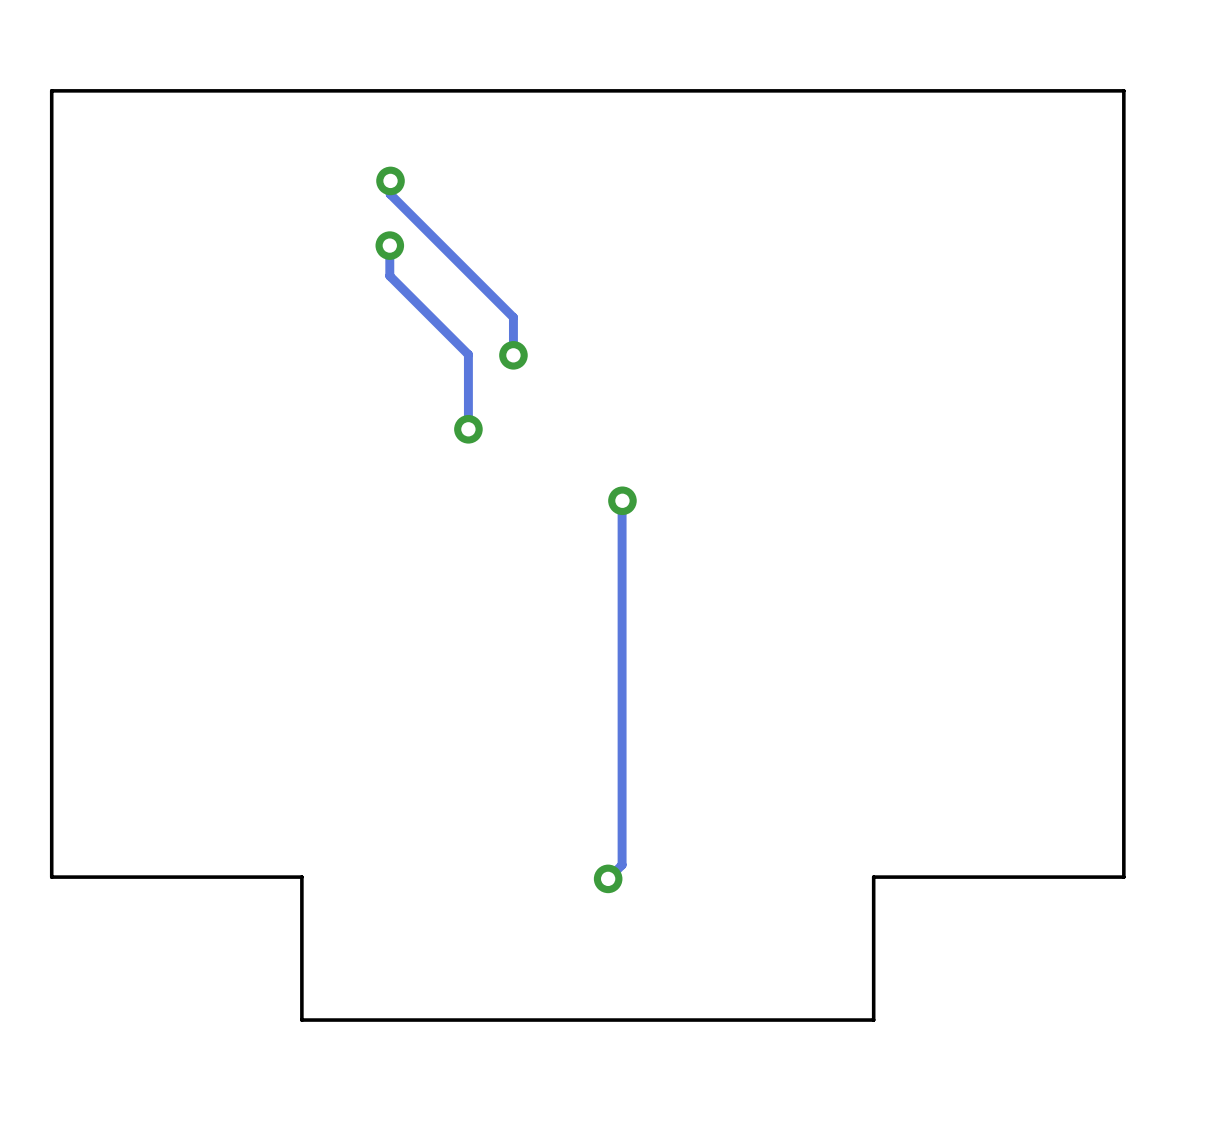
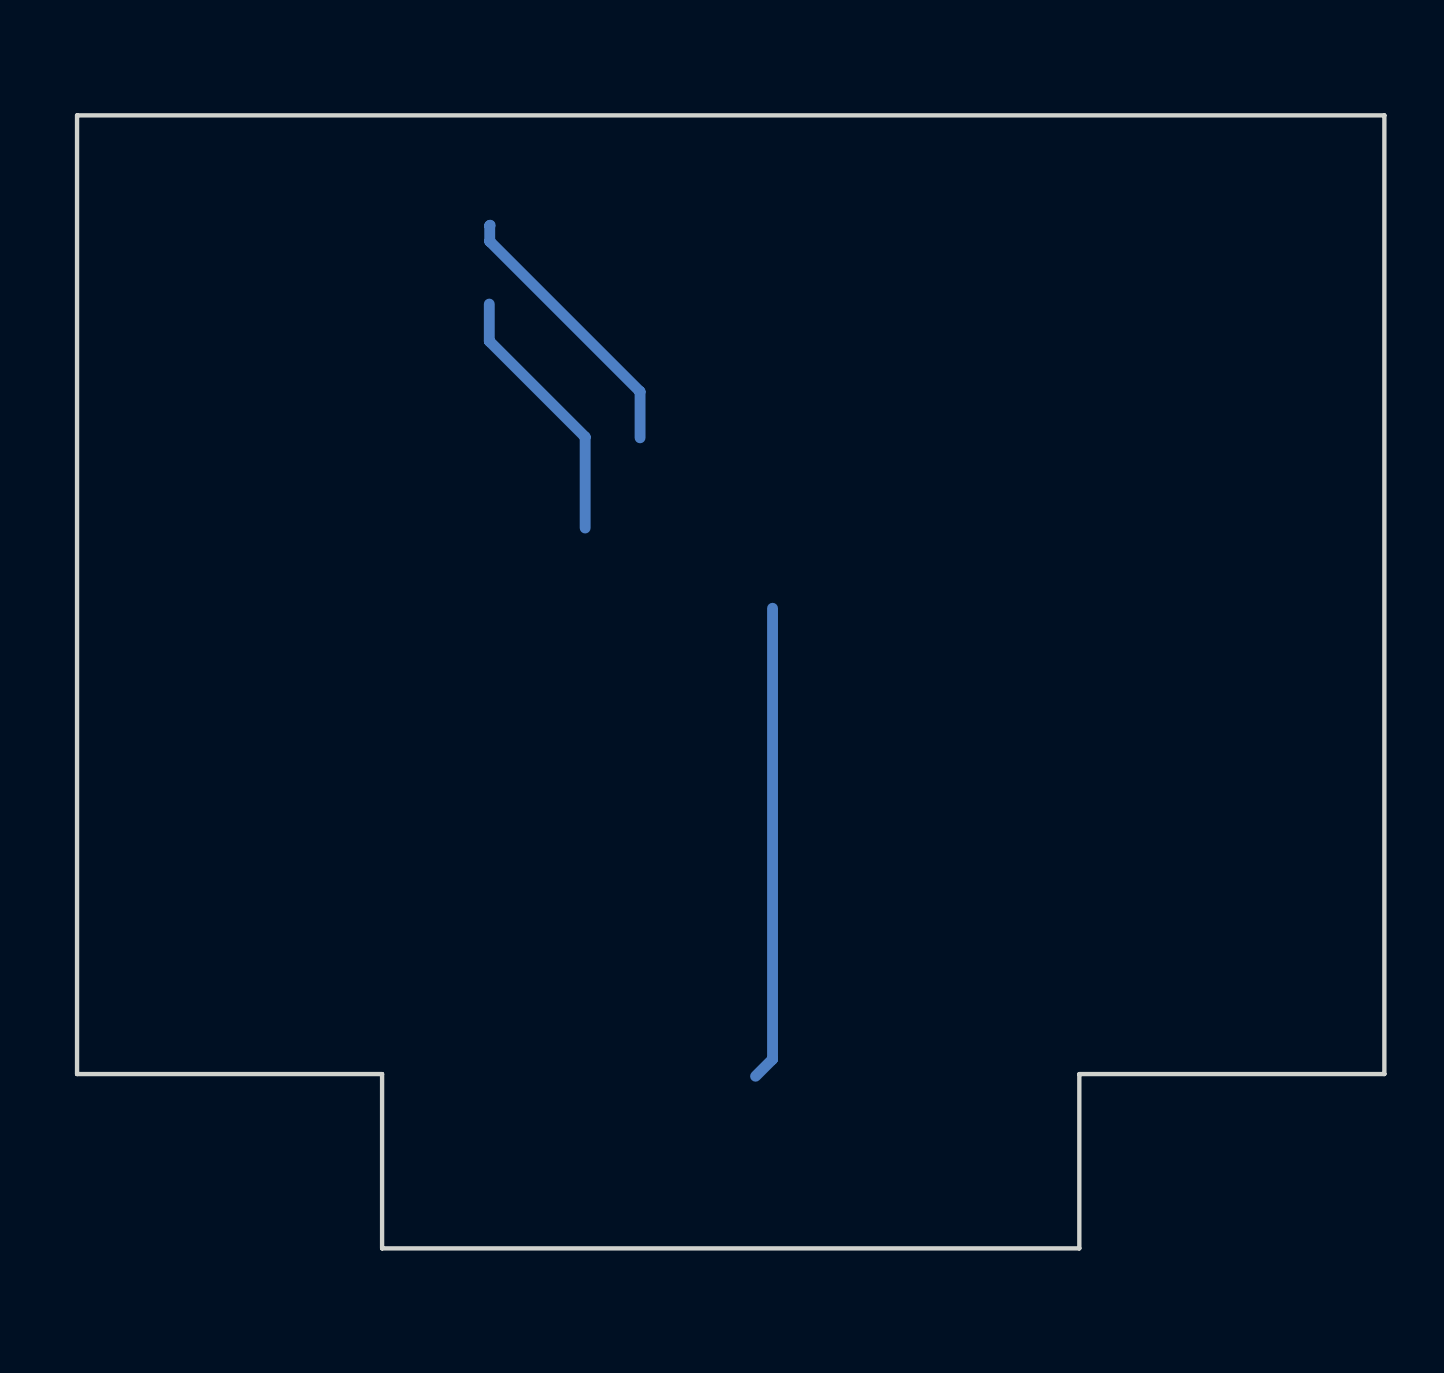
via: (390, 180) -> none
via: (389, 245) -> none
via: (513, 355) -> none
via: (468, 429) -> none
via: (622, 500) -> none
via: (608, 878) -> none

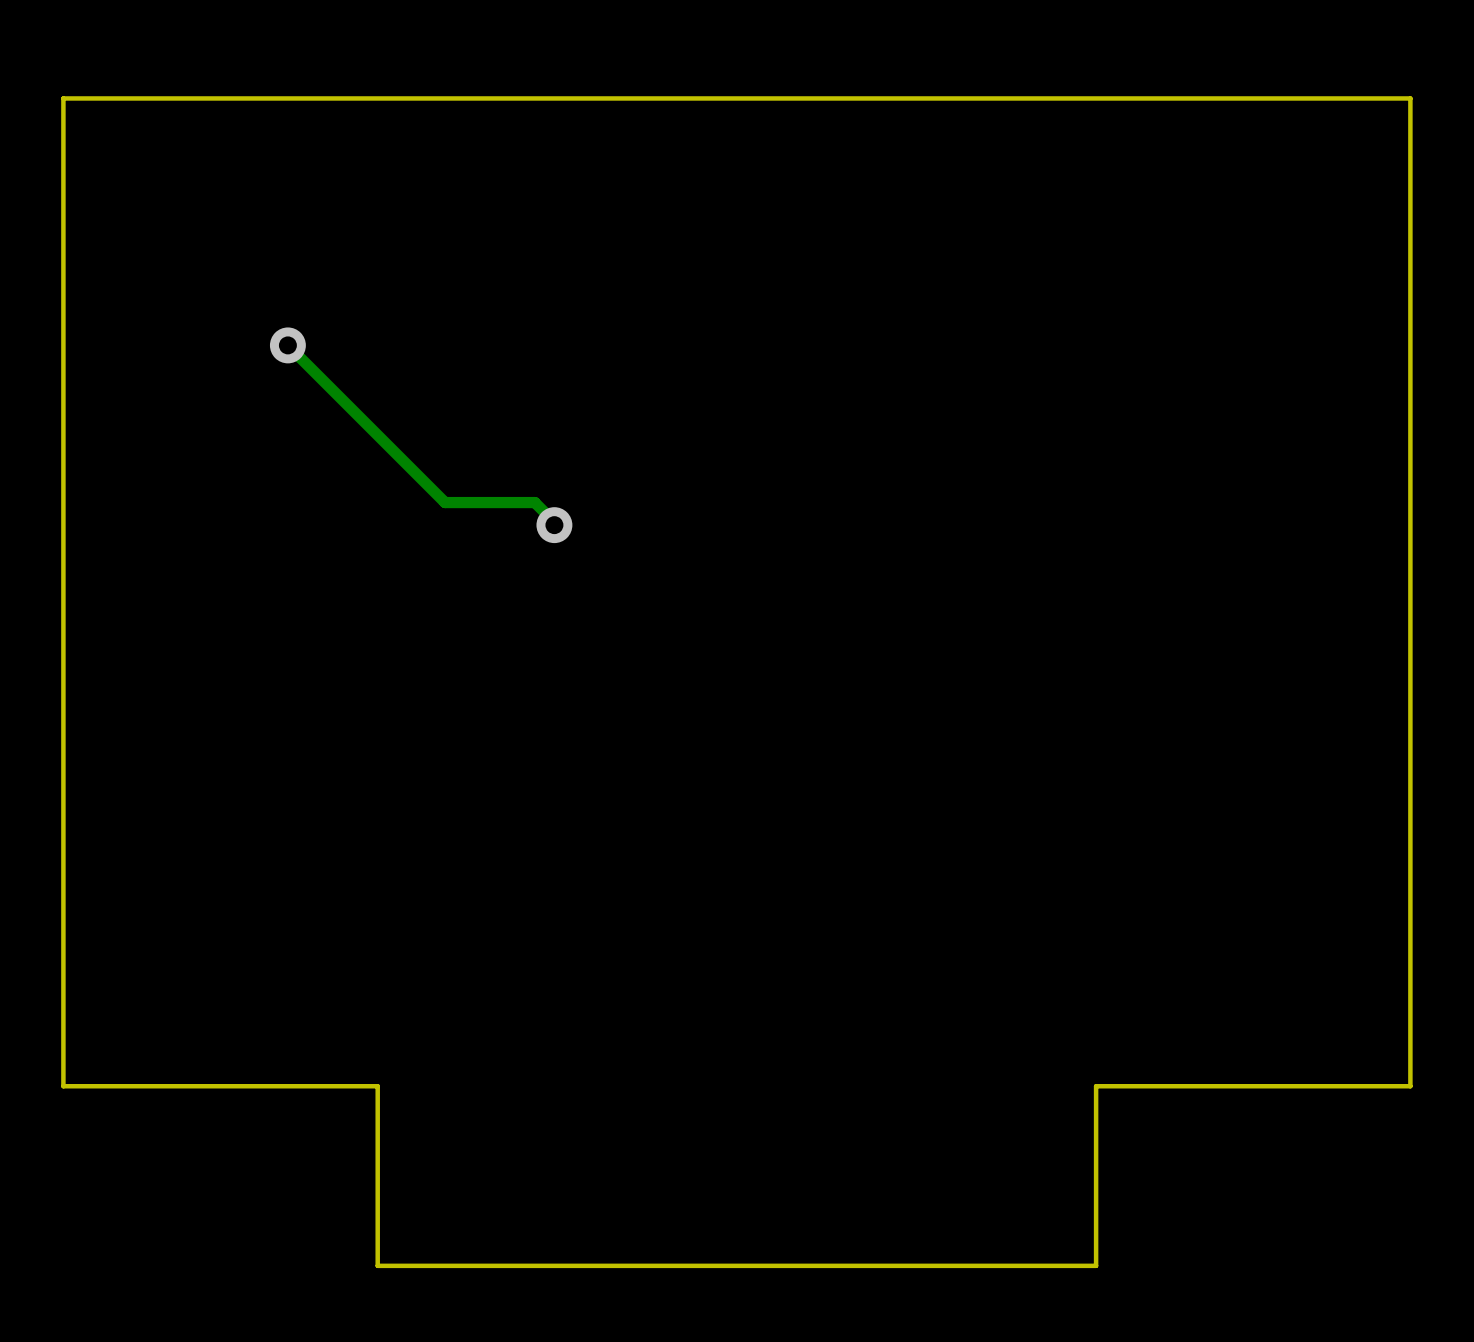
track: (489, 225) (489, 241) (640, 391) (640, 437) -> none
track: (489, 304) (489, 341) (585, 436) (585, 528) -> none
track: none -> (287, 345) (445, 502) (534, 502) (554, 522) (554, 525)
via: none -> (287, 345)
via: none -> (554, 525)
track: (772, 608) (772, 1059) (755, 1076) -> none

